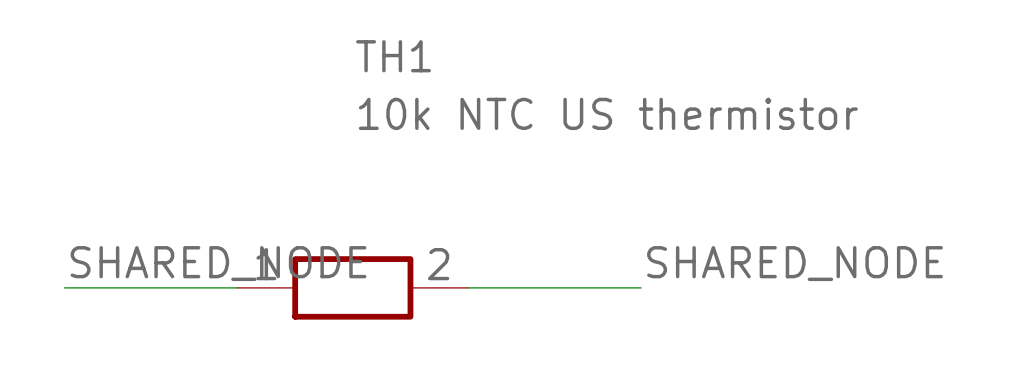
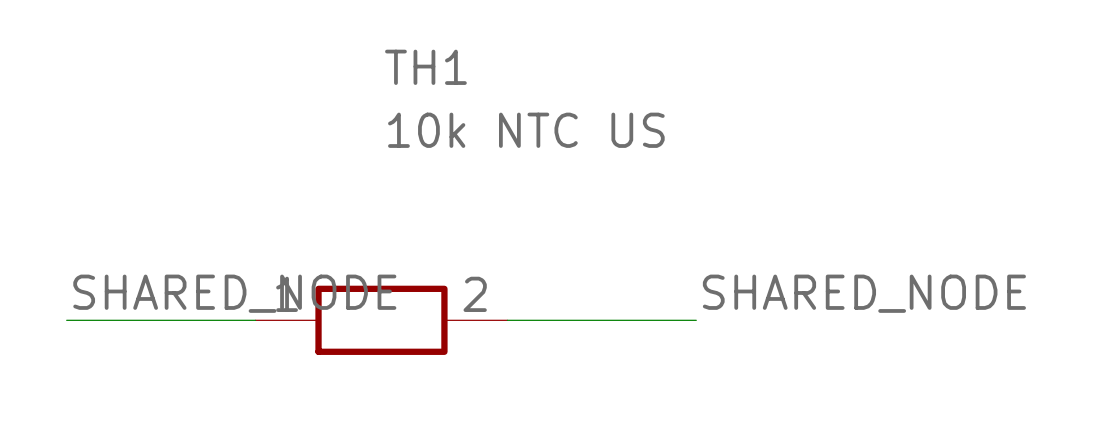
TH1 value: 10k NTC US thermistor (608, 113) -> 10k NTC US (526, 130)

